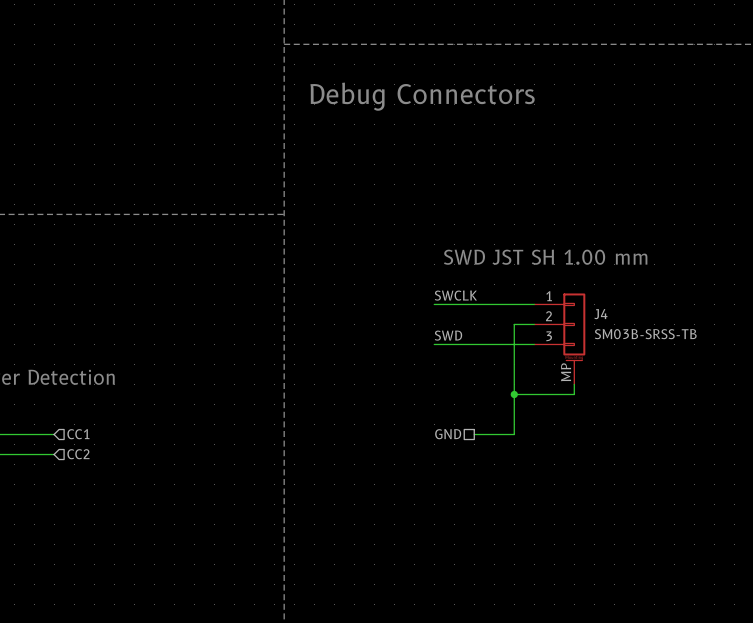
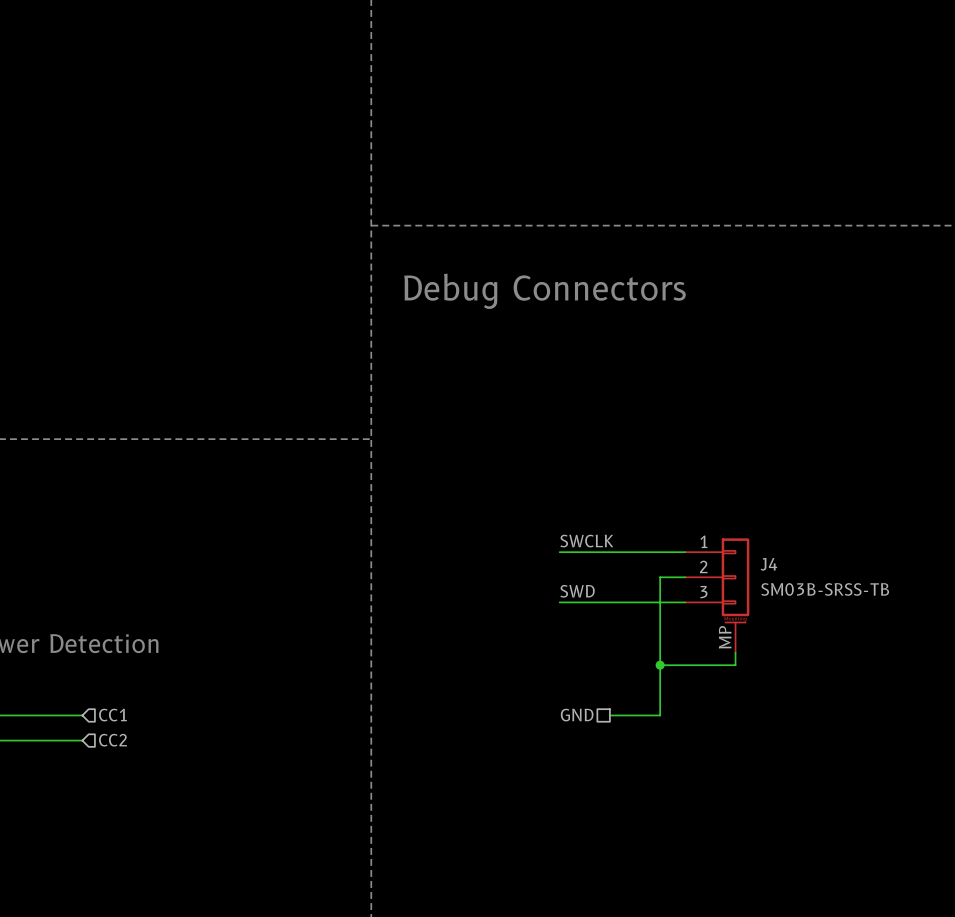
text: SWD JST SH 1.00 mm (545, 257) -> none

